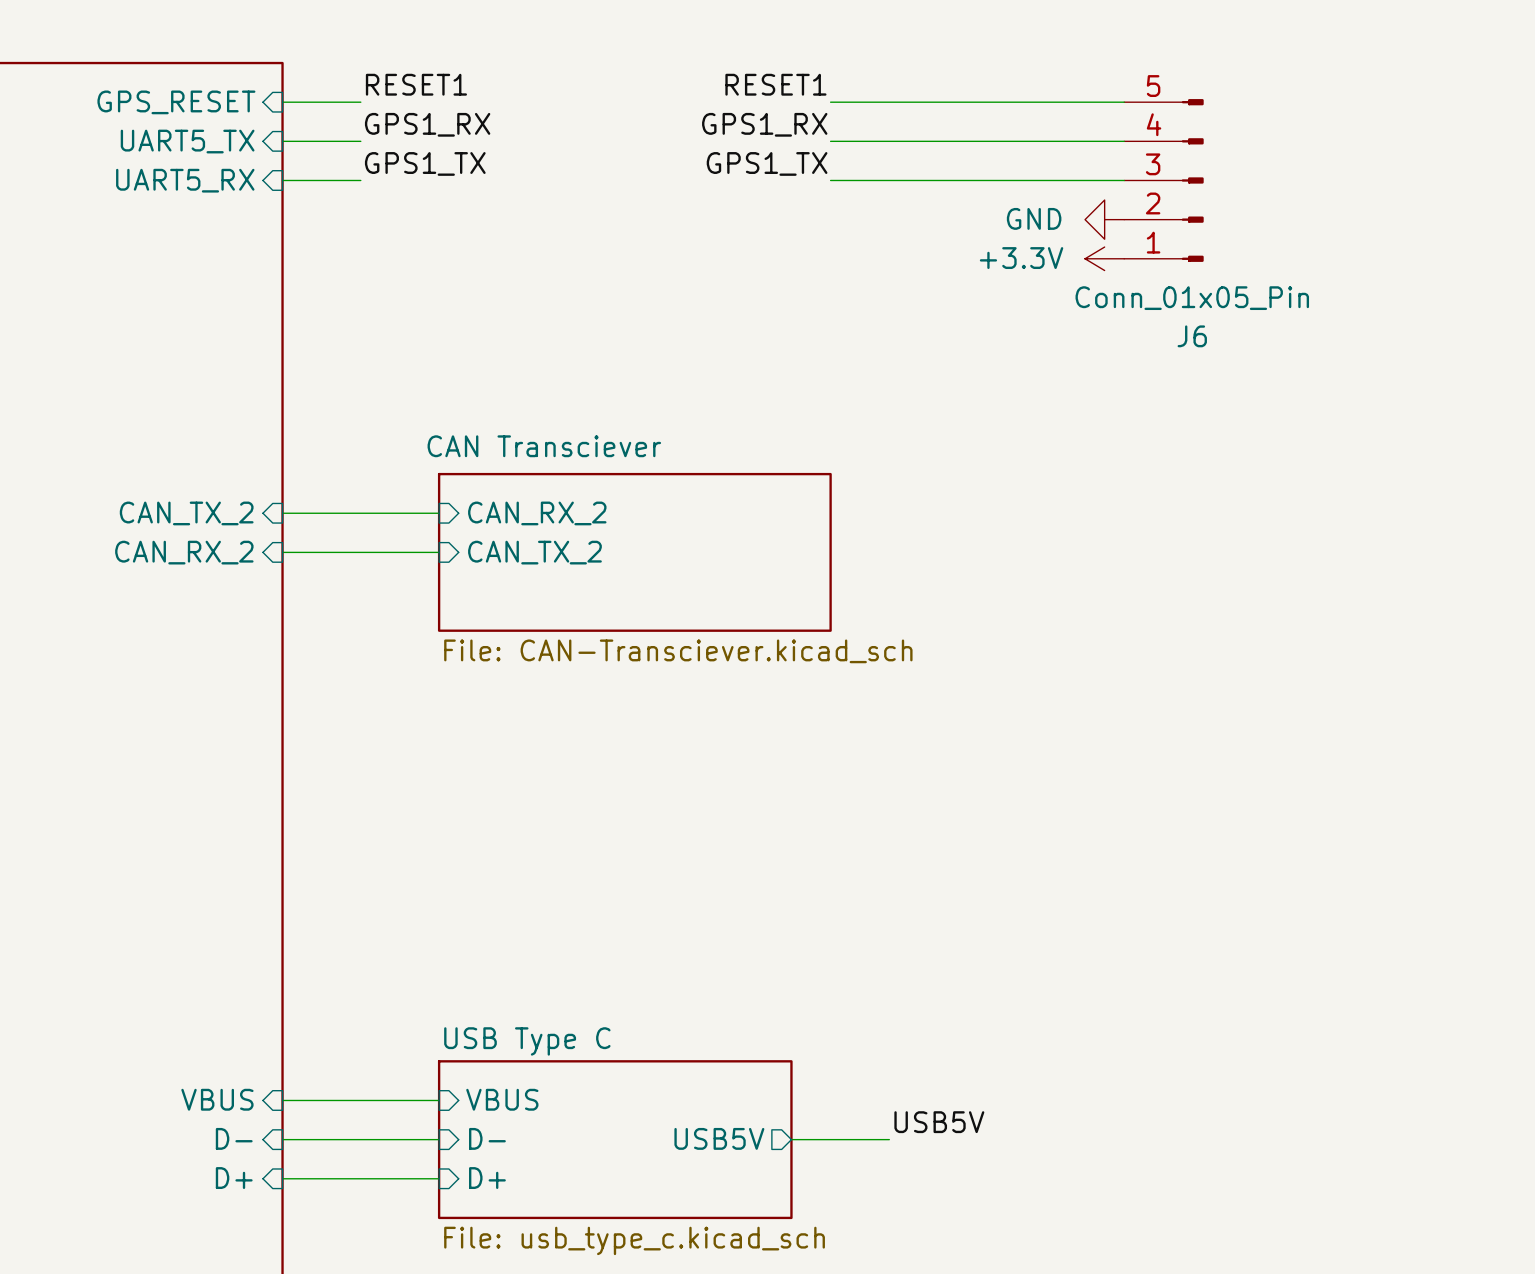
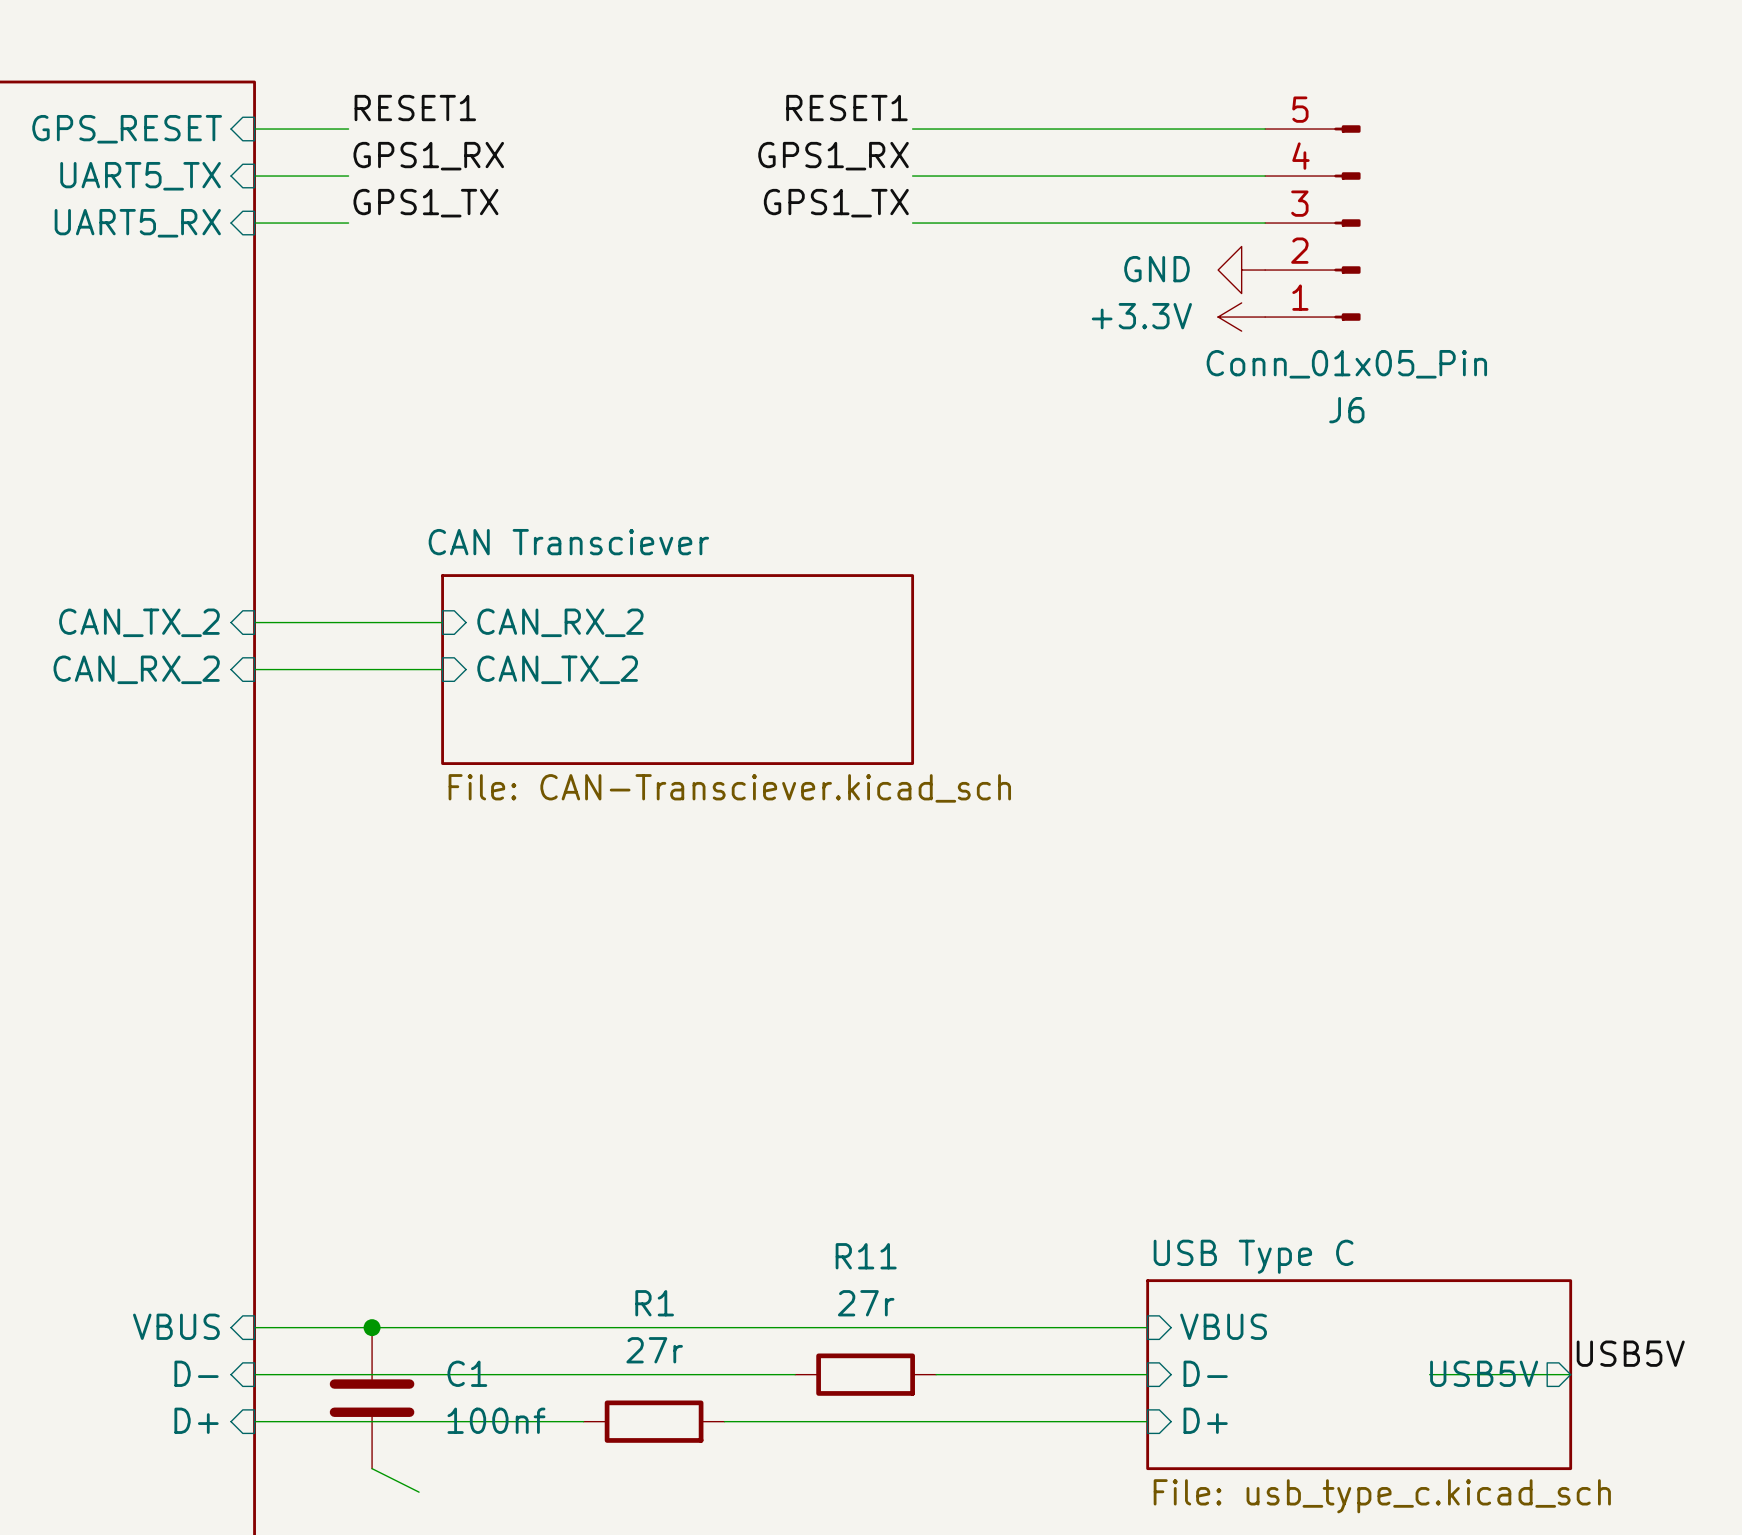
sheet pin: VBUS (502, 1099) -> none
sheet pin: none -> VBUS (1223, 1326)
junction: none -> (372, 1327)
wire: none -> (442, 1327) (1147, 1327)
label: USB5V (939, 1122) -> none
label: none -> USB5V (1630, 1353)
sheet pin: D- (487, 1138) -> none
sheet pin: USB5V (719, 1138) -> none
sheet pin: none -> D- (1205, 1373)
sheet pin: none -> USB5V (1484, 1373)
wire: none -> (442, 1374) (795, 1374)
sheet USB Type C: File: usb_type_c.kicad_sch (615, 1139) -> none
wire: (791, 1139) (850, 1139) -> none
R11: none -> 27r (865, 1374)
wire: none -> (983, 1374) (1147, 1374)
sheet USB Type C: none -> File: usb_type_c.kicad_sch (1359, 1374)
wire: none -> (1429, 1374) (1570, 1374)
C1: none -> 100nf (372, 1398)
wire: none -> (442, 1421) (583, 1421)
sheet pin: D+ (487, 1178) -> none
R1: none -> 27r (654, 1421)
wire: none -> (724, 1421) (1147, 1421)
sheet pin: none -> D+ (1205, 1420)
wire: none -> (372, 1468) (419, 1492)

